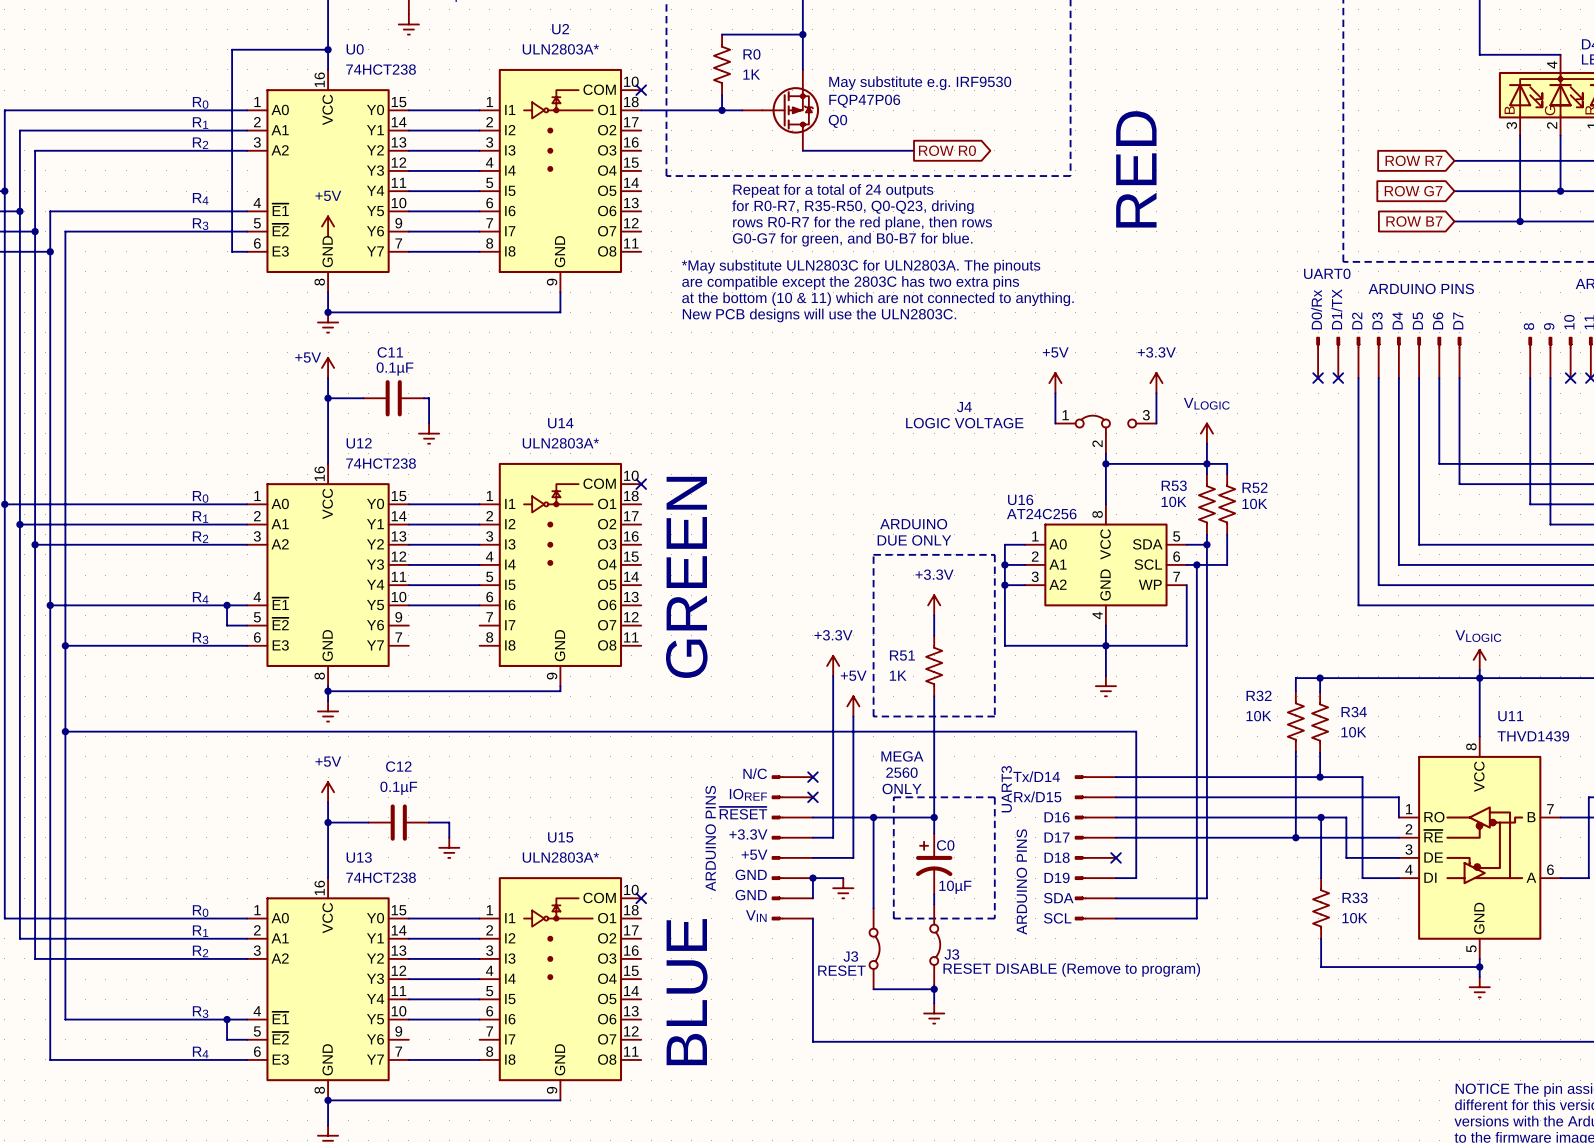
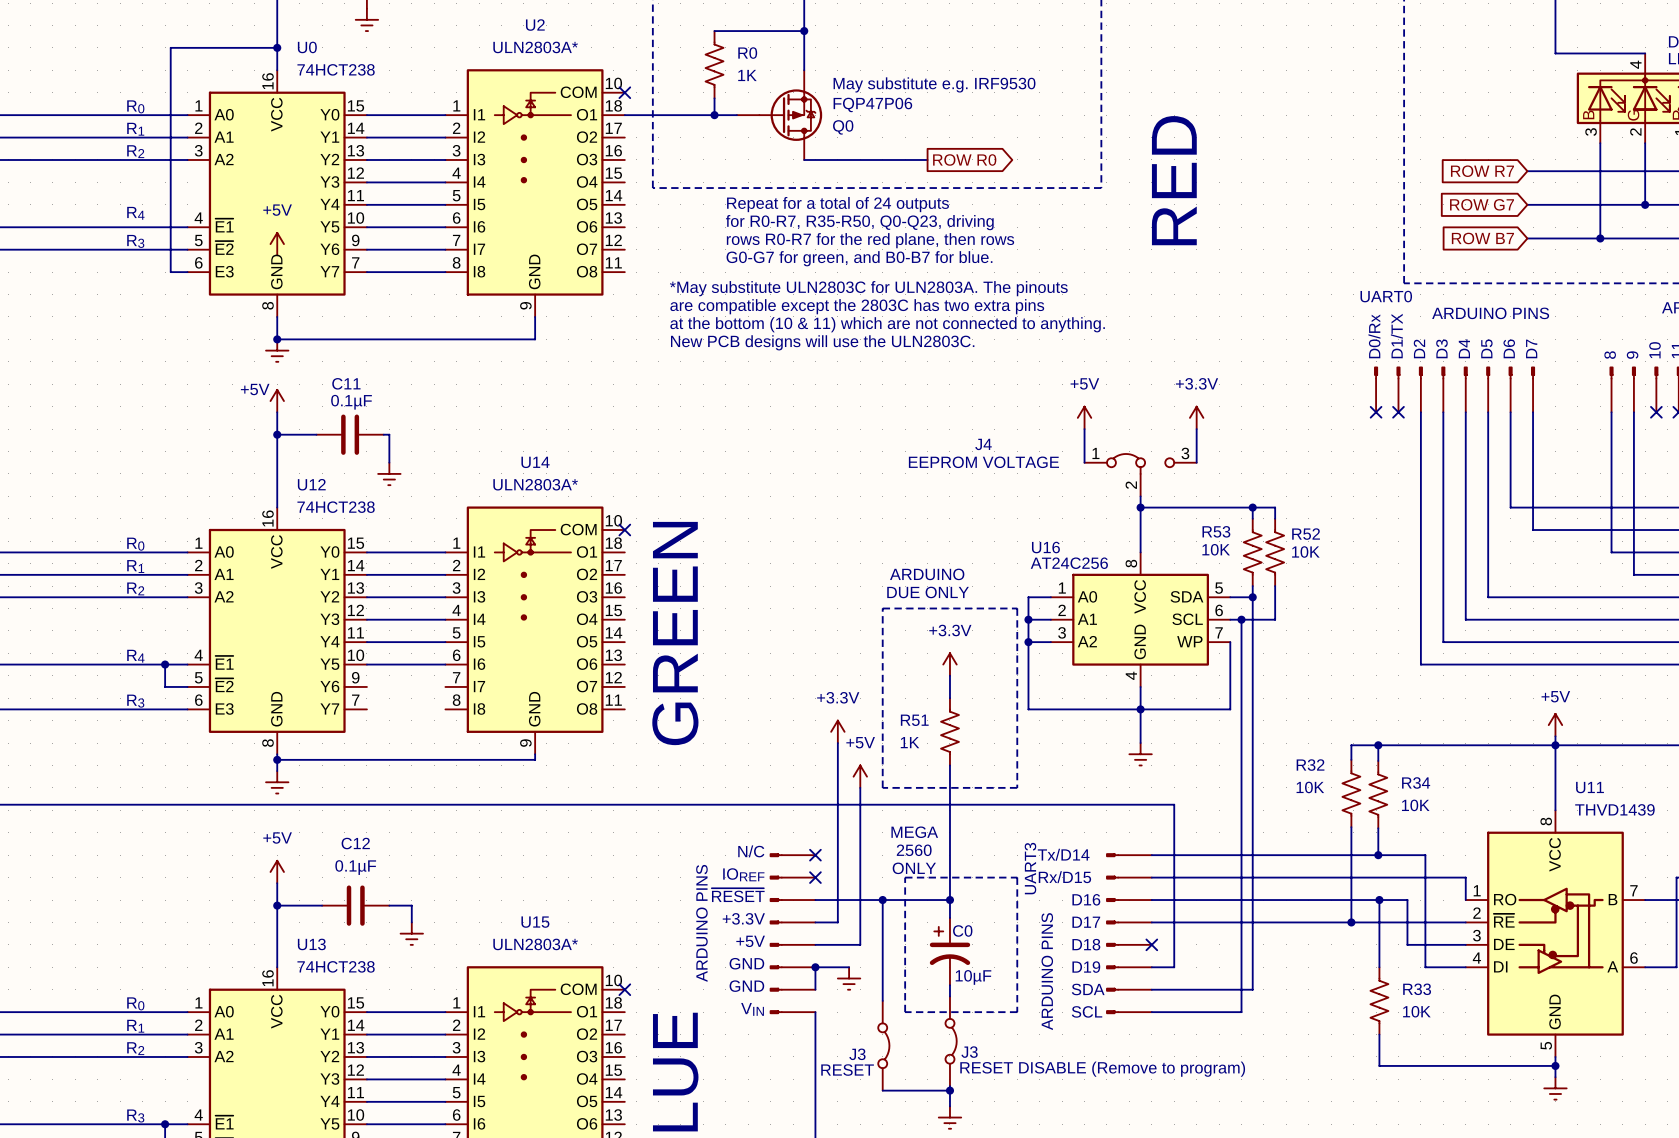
J4 value: LOGIC VOLTAGE (964, 423) -> EEPROM VOLTAGE (983, 462)
power symbol: VLOGIC (1206, 433) -> none
wire: (1206, 443) (1206, 463) -> none
power symbol: VLOGIC (1479, 659) -> +5V (1555, 725)

